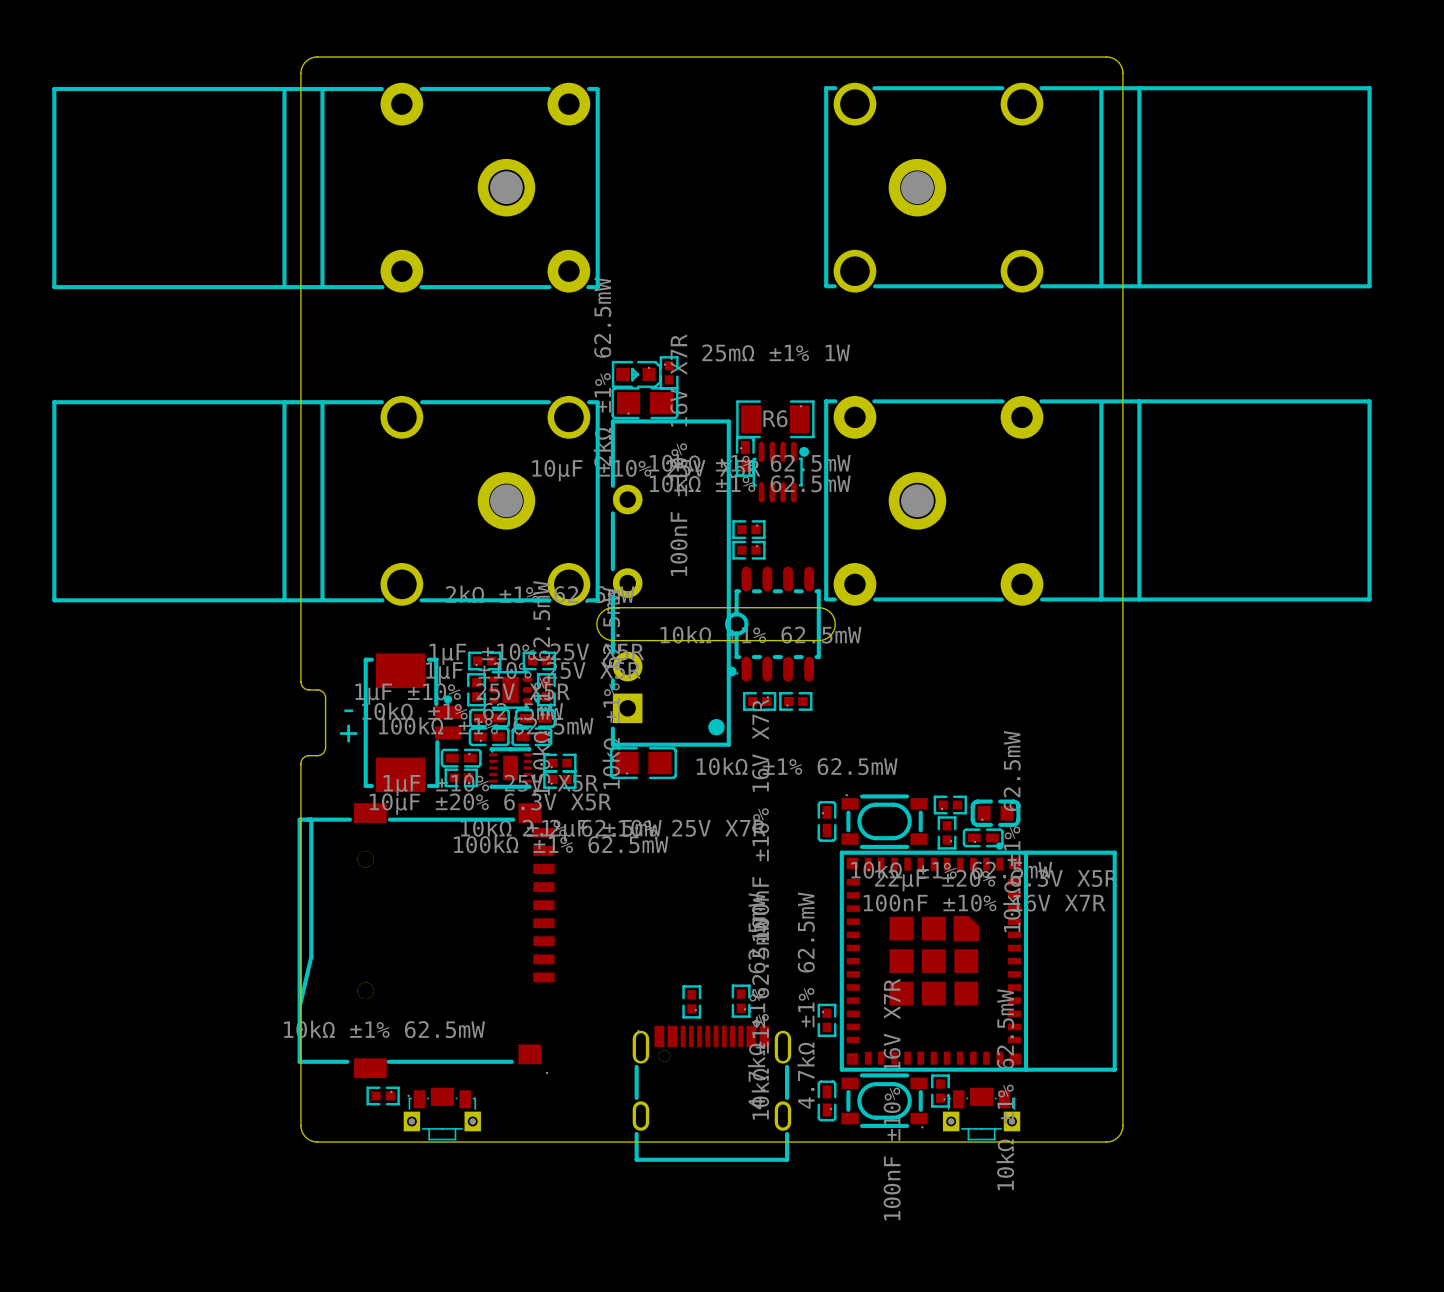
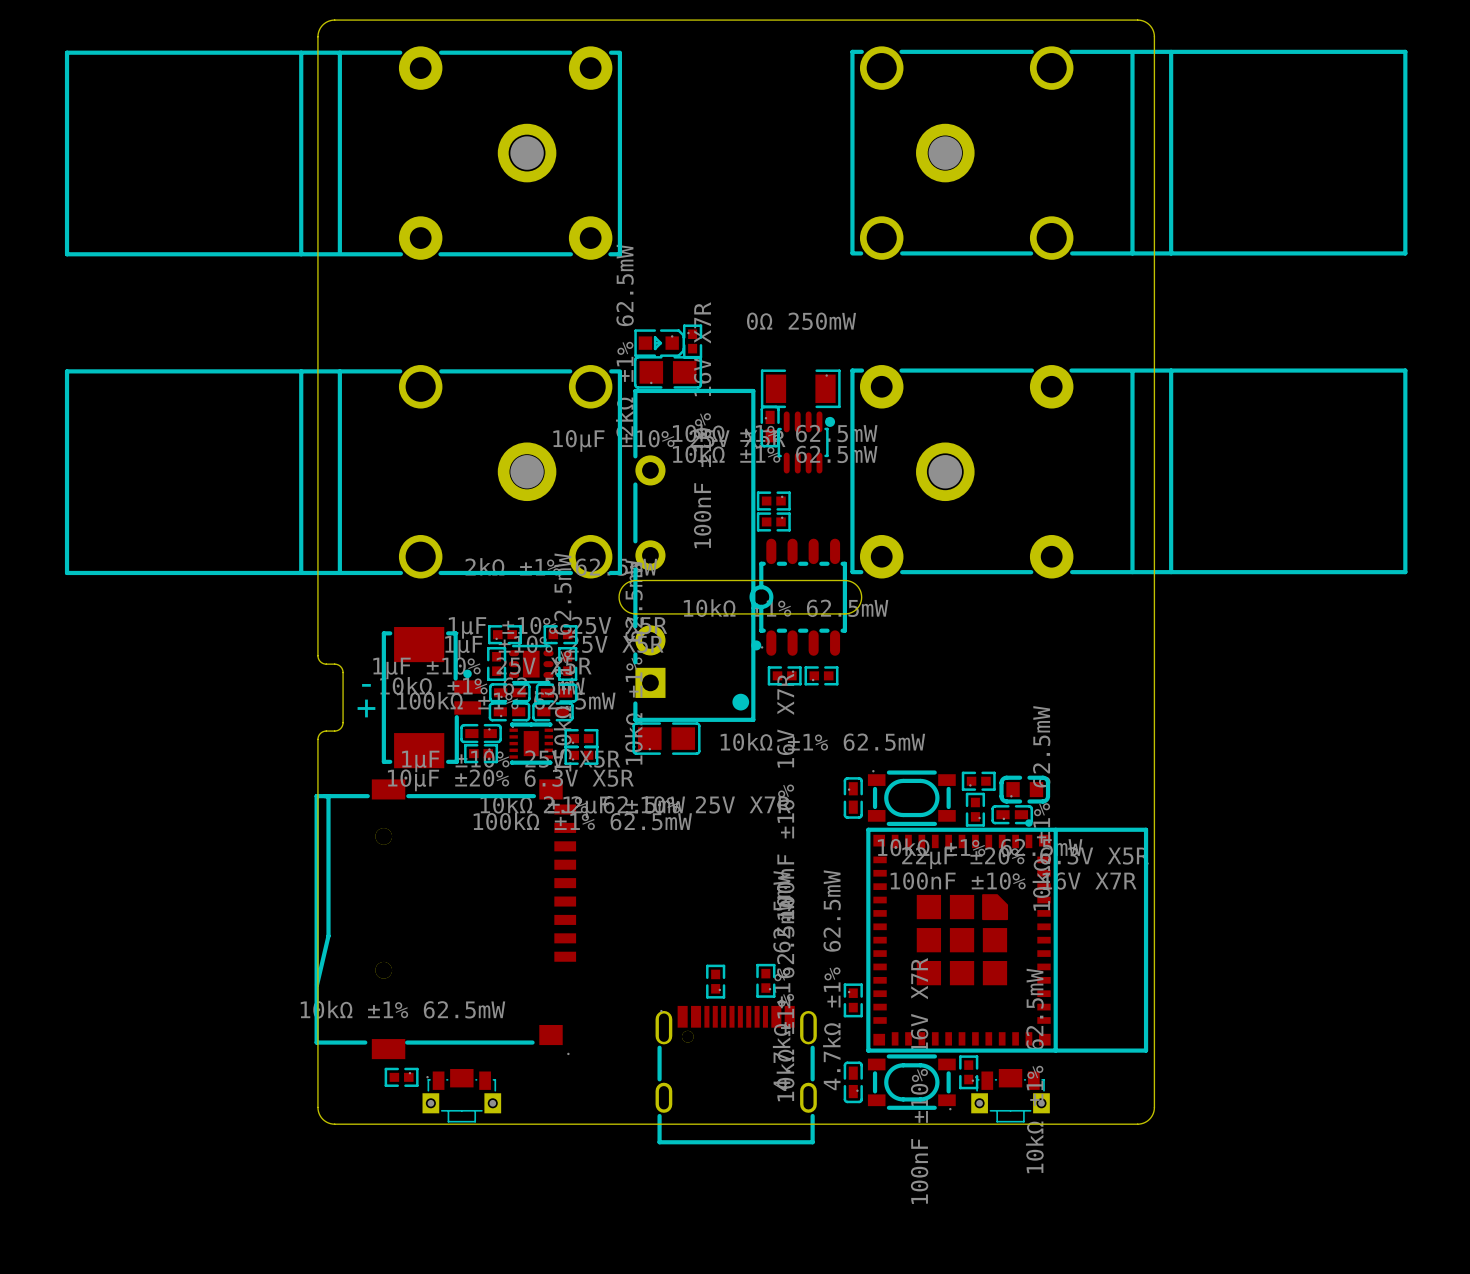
R6 value: 25mΩ ±1% 1W (776, 352) -> 0Ω 250mW (801, 321)
R6 name: R6 (775, 418) -> none

